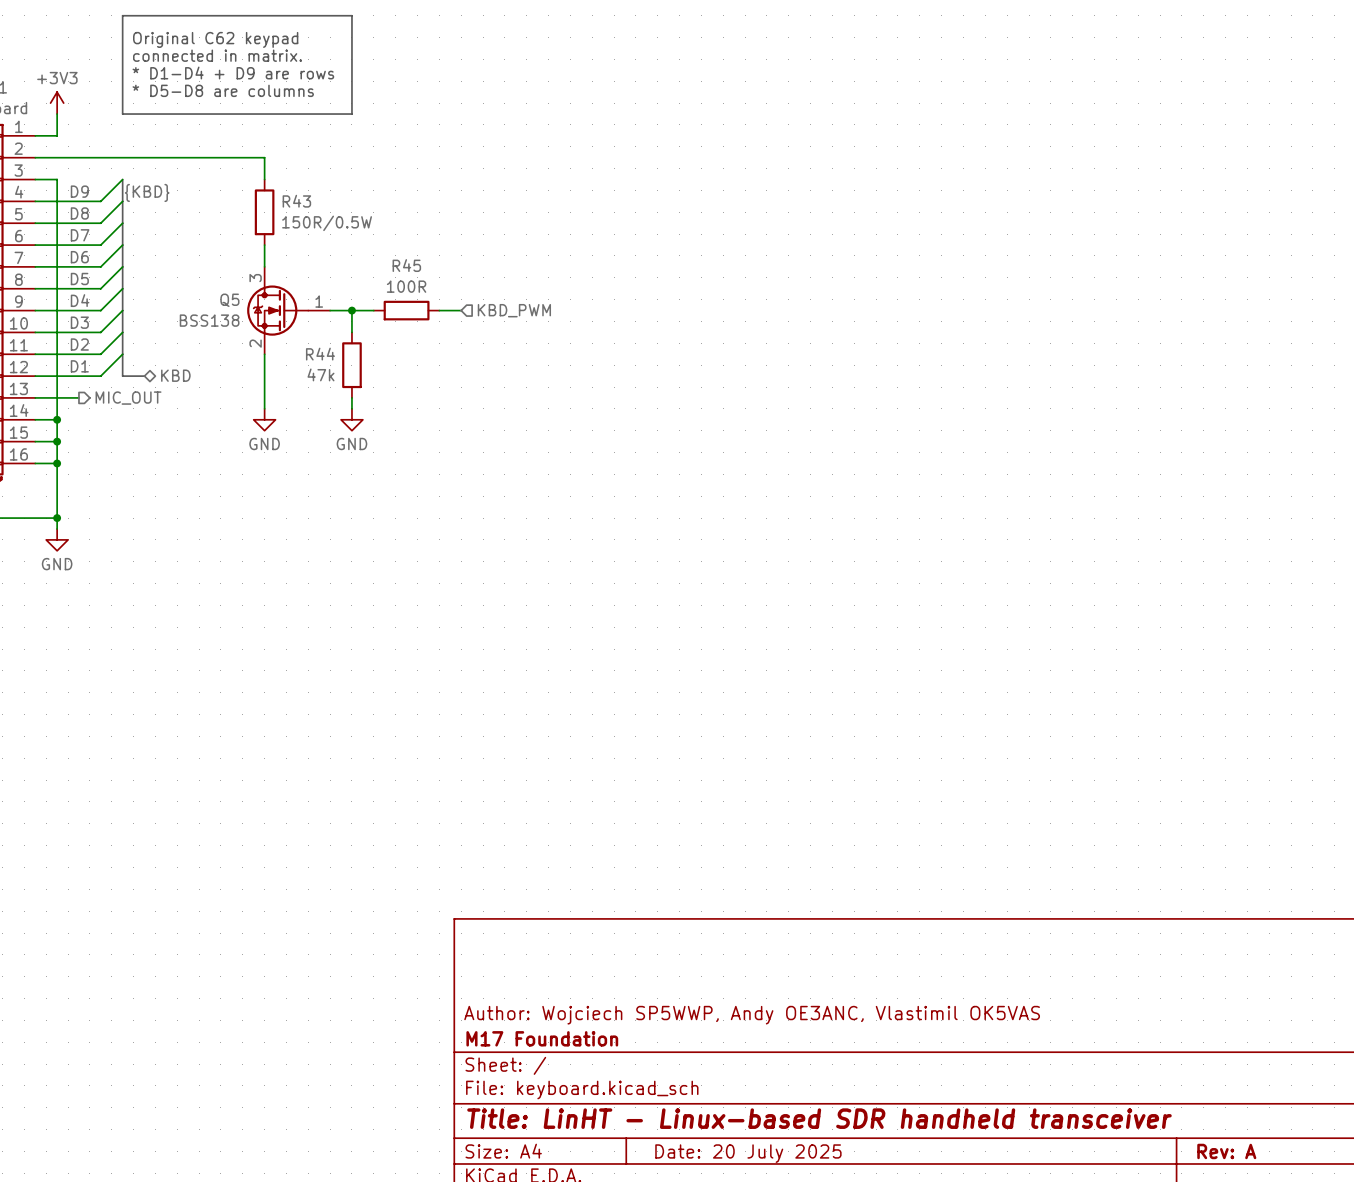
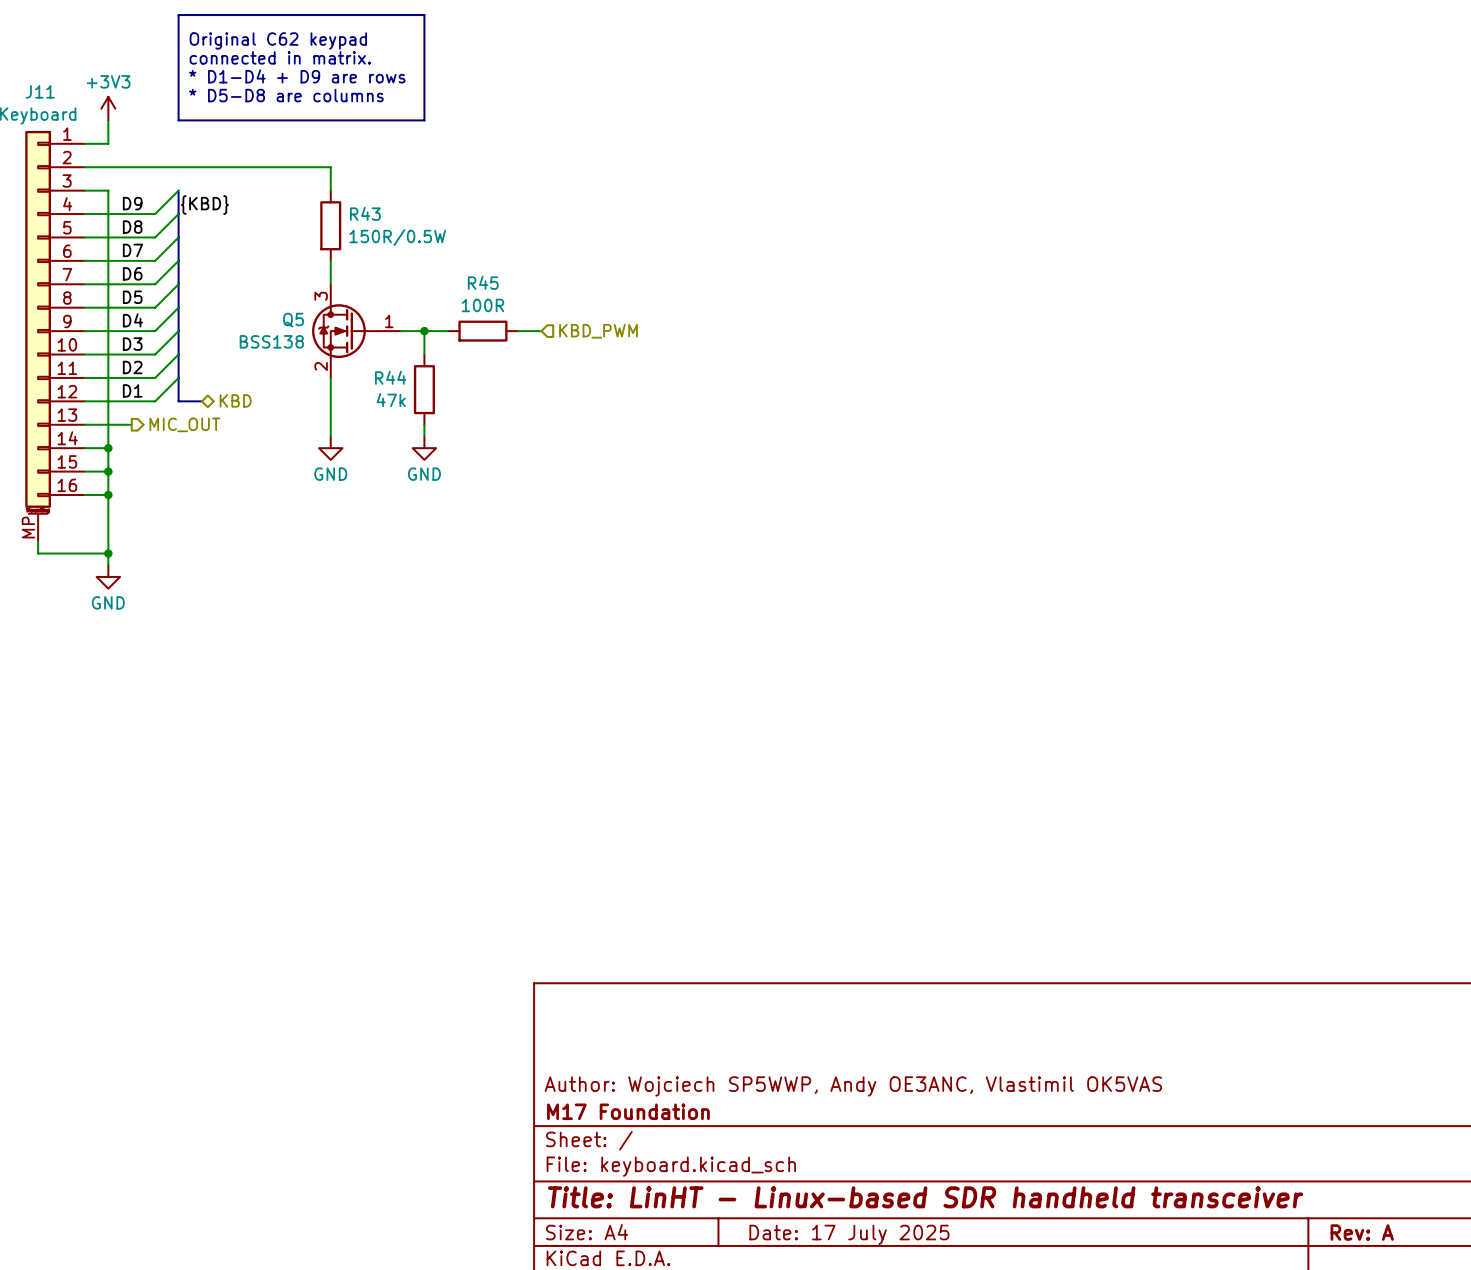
title block: Date: 20 July 2025 (748, 1153) -> Date: 17 July 2025 (849, 1234)

